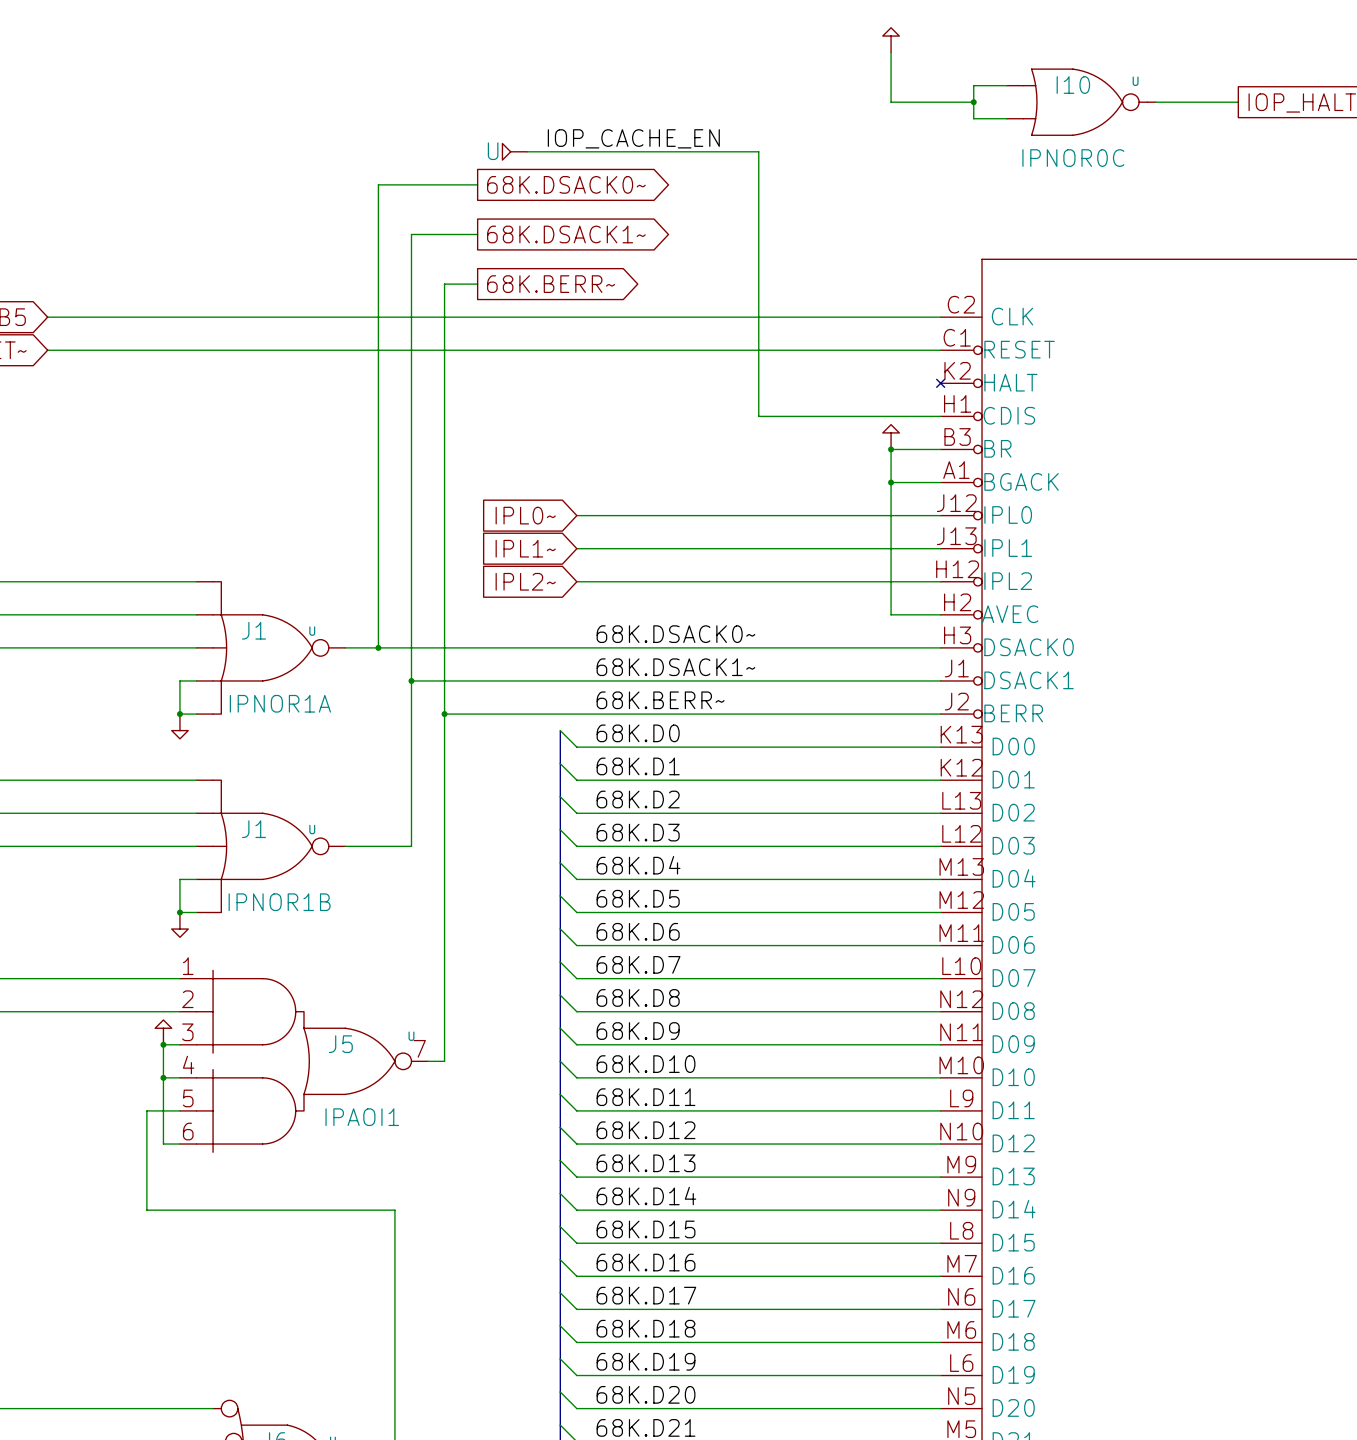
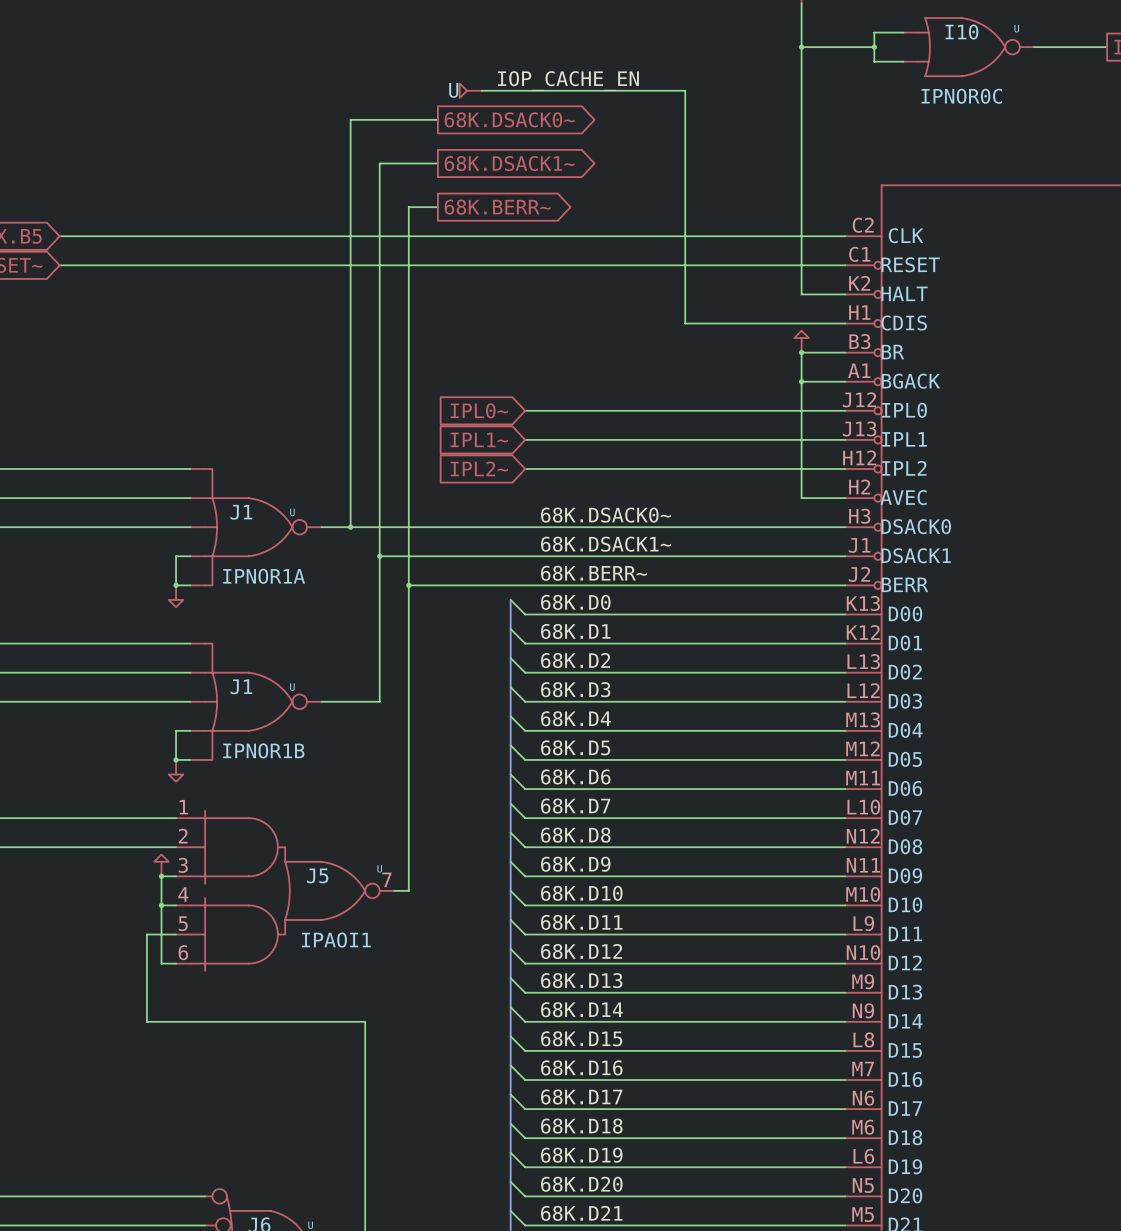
wire: none -> (801, 47) (801, 294) (845, 294)
junction: none -> (801, 47)
no-connect mark: (940, 383) -> none

